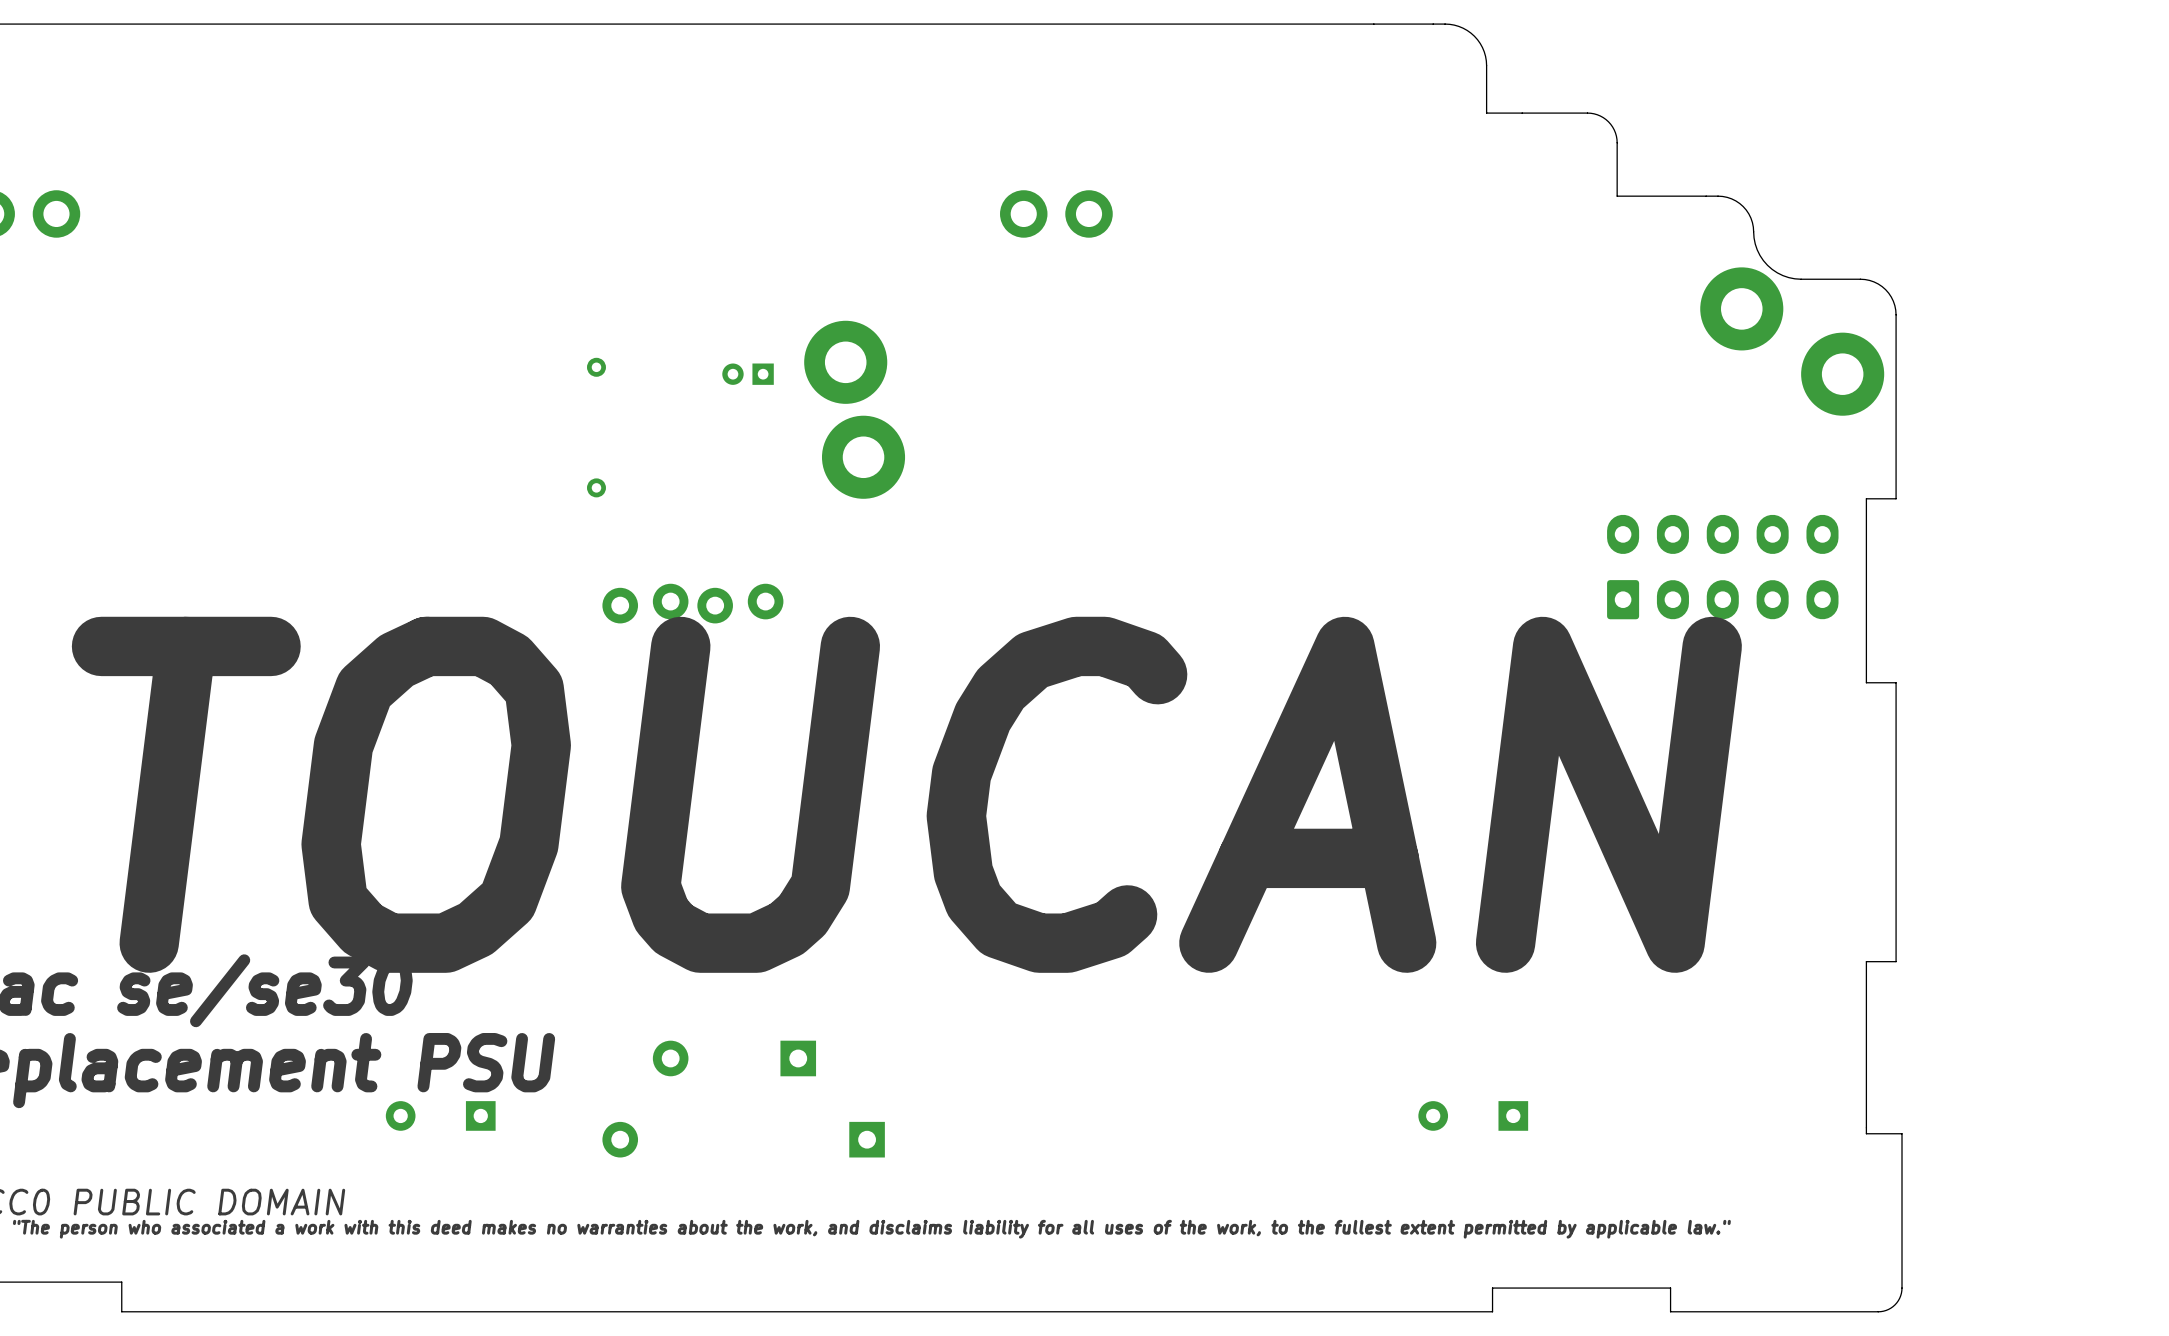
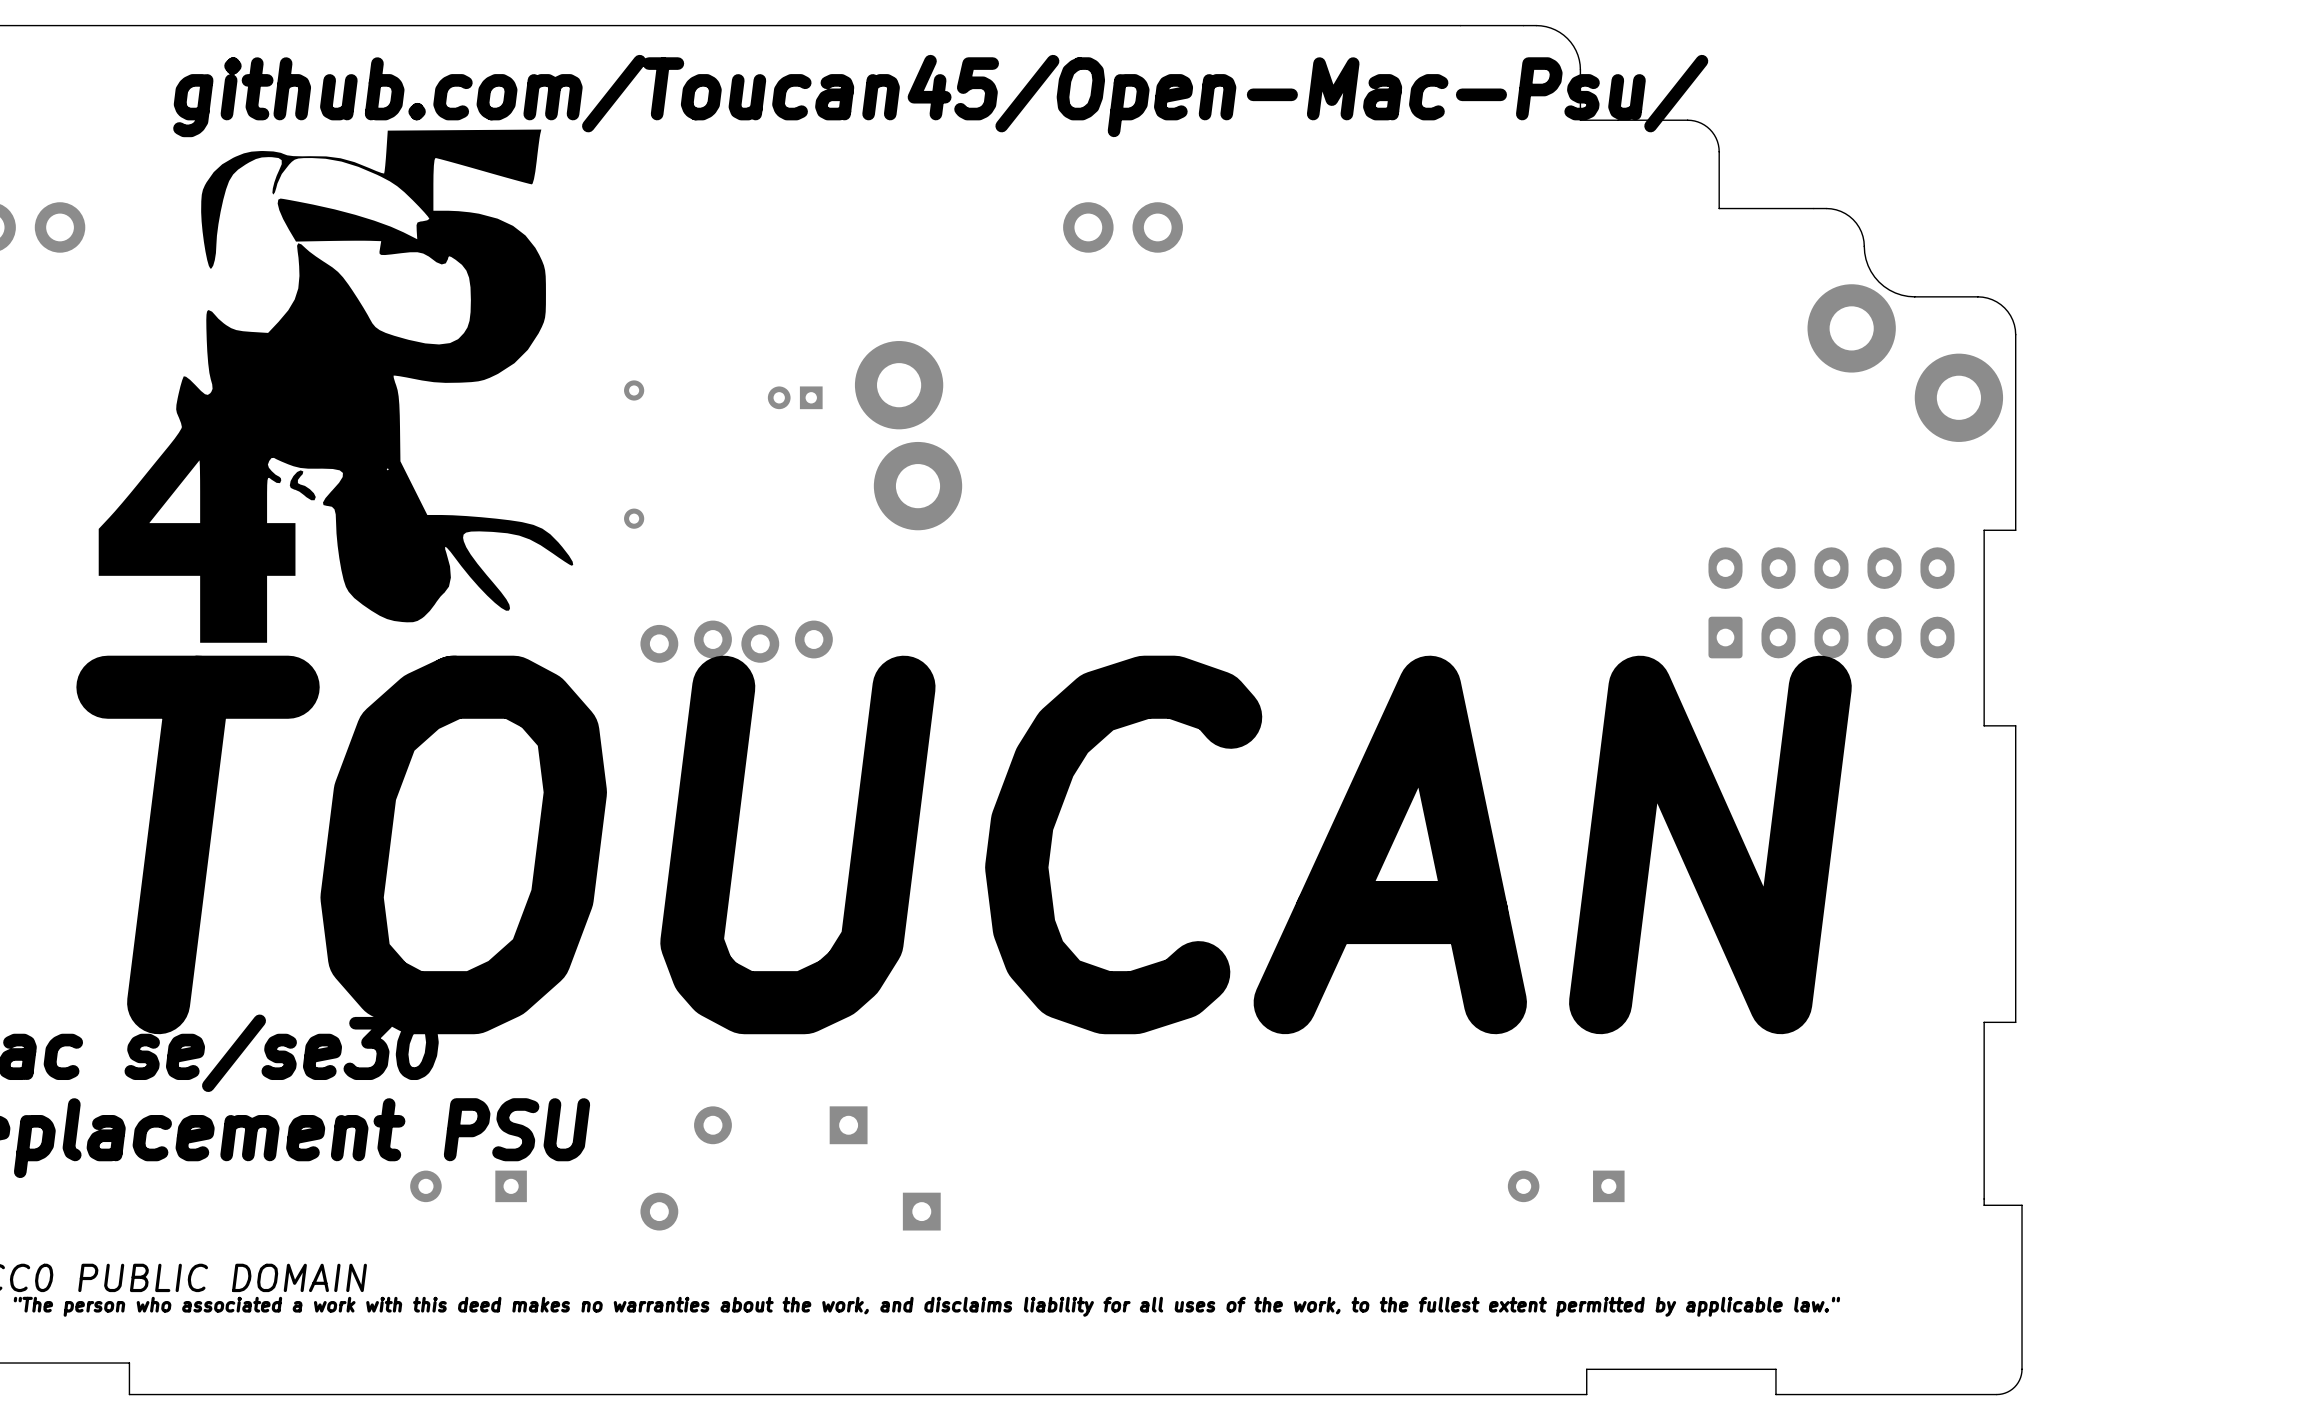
text: none -> github.com/Toucan45/Open-Mac-Psu/ (940, 96)
part: none -> (335, 386)

